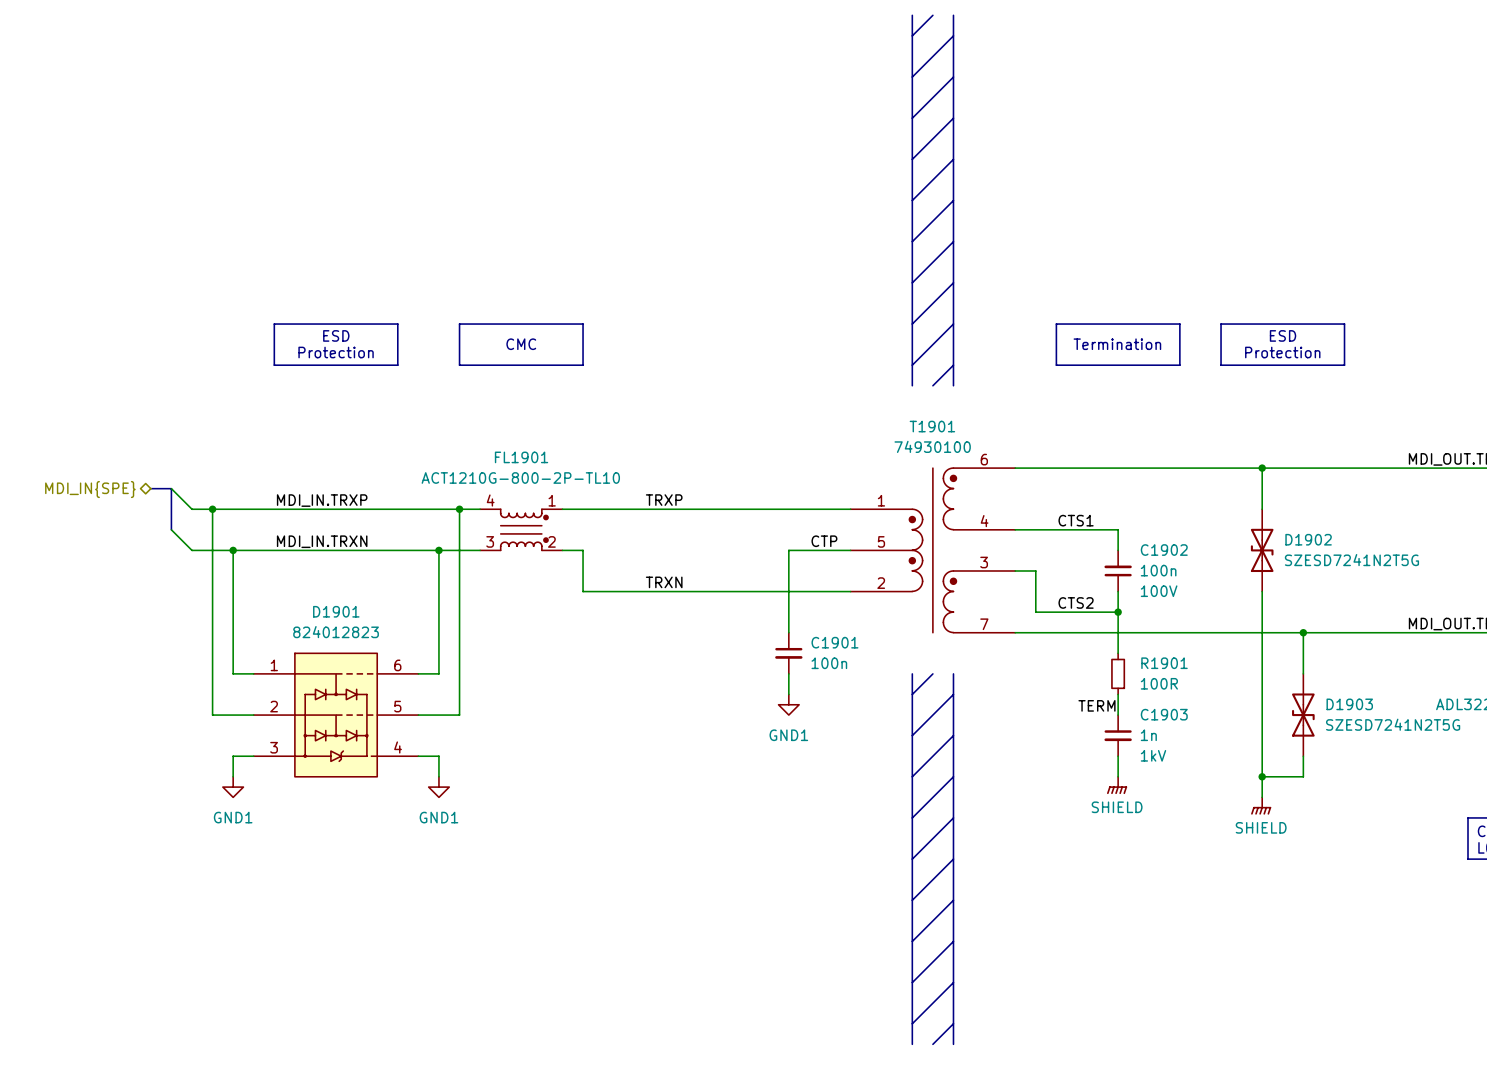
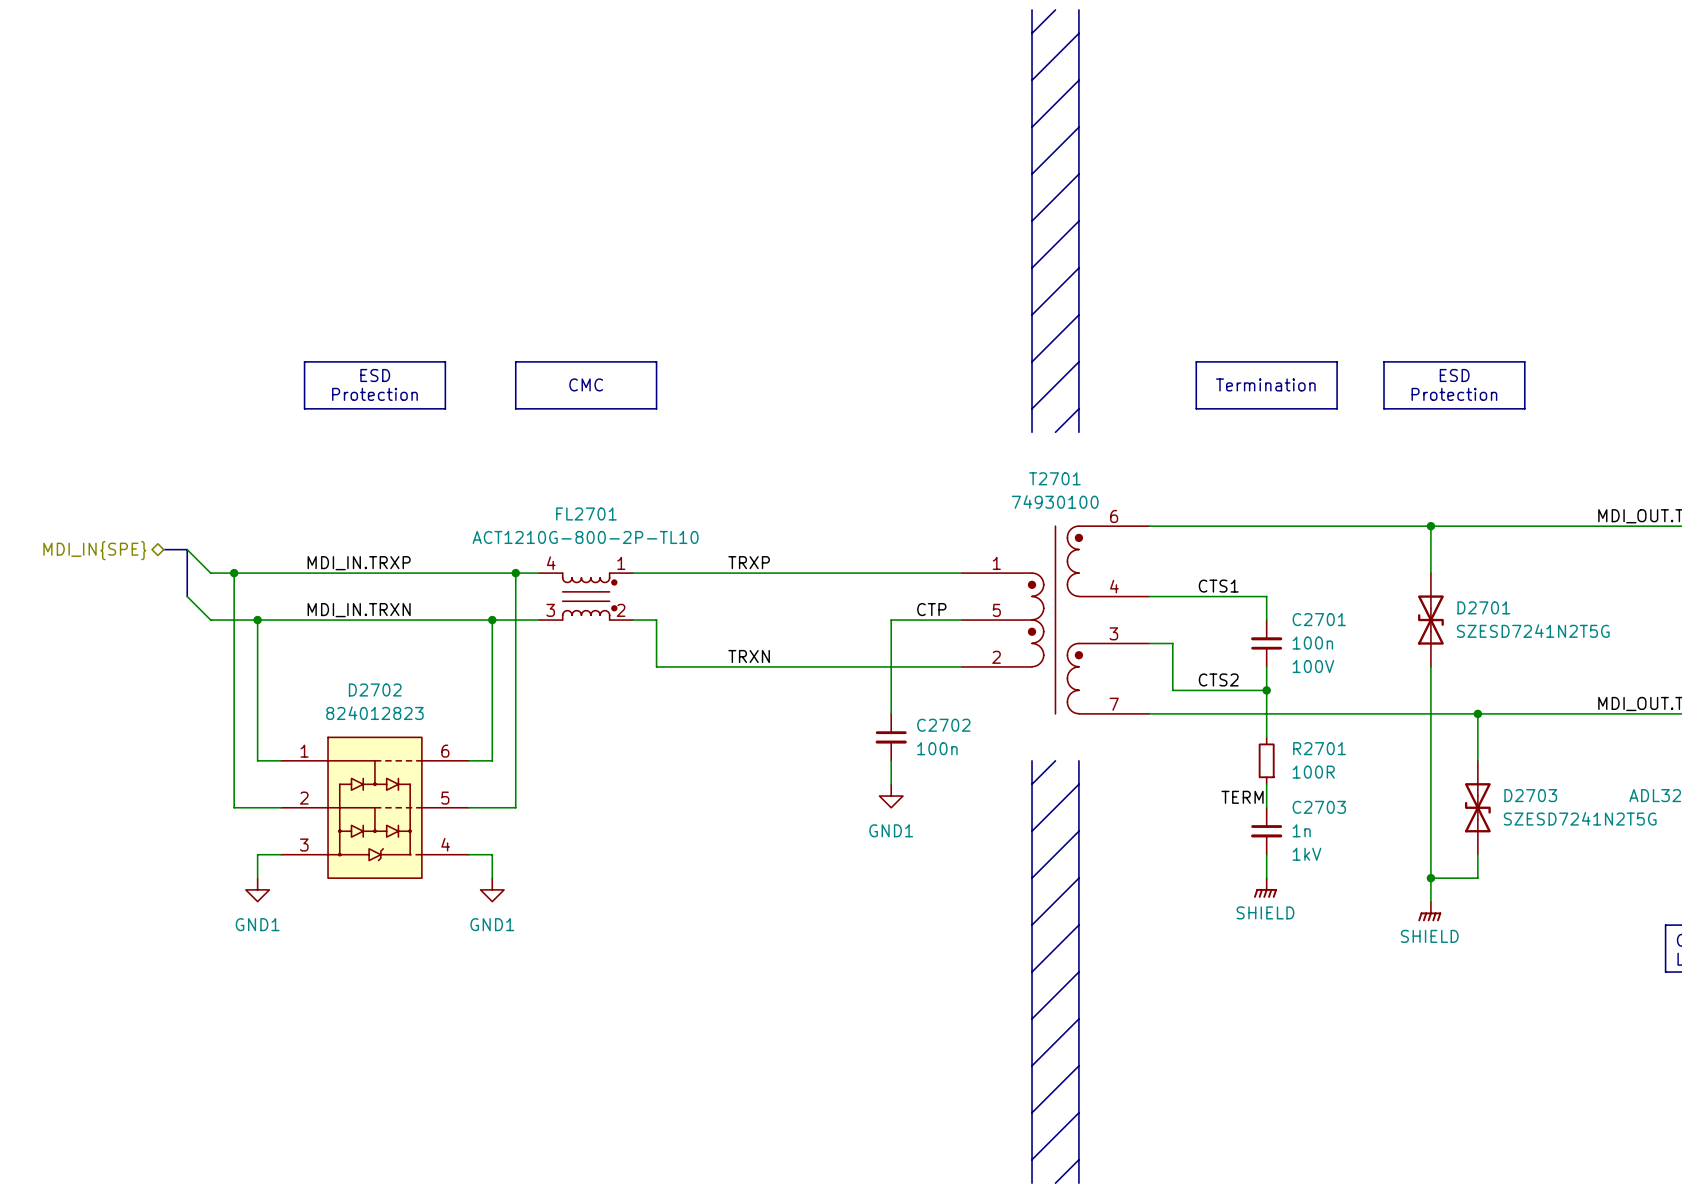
T1901 name: T1901 (932, 426) -> T2701 (1054, 478)
FL1901 name: FL1901 (521, 457) -> FL2701 (586, 514)
D1902 name: D1902 (1308, 539) -> D2701 (1483, 607)
C1902 name: C1902 (1164, 550) -> C2701 (1319, 619)
D1901 name: D1901 (336, 611) -> D2702 (375, 690)
C1901 name: C1901 (834, 642) -> C2702 (943, 725)
R1901 name: R1901 (1164, 663) -> R2701 (1319, 748)
D1903 name: D1903 (1349, 704) -> D2703 (1530, 795)
C1903 name: C1903 (1164, 714) -> C2703 (1319, 807)

